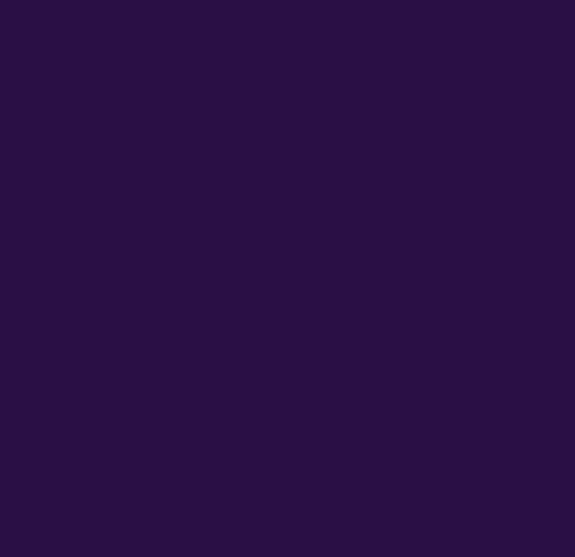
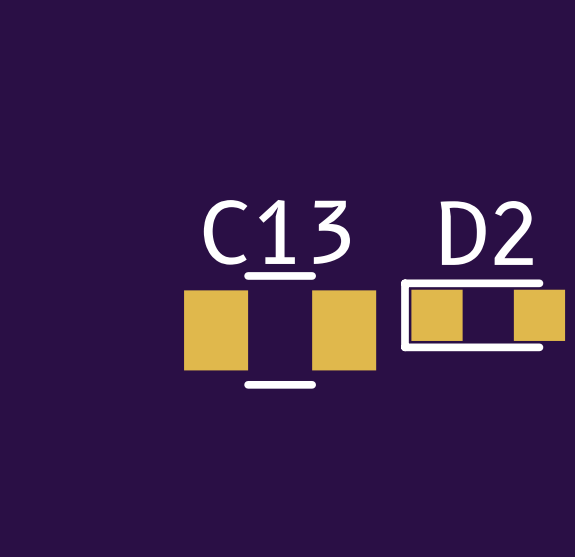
D2: none -> (483, 315)
C13: none -> (280, 330)

